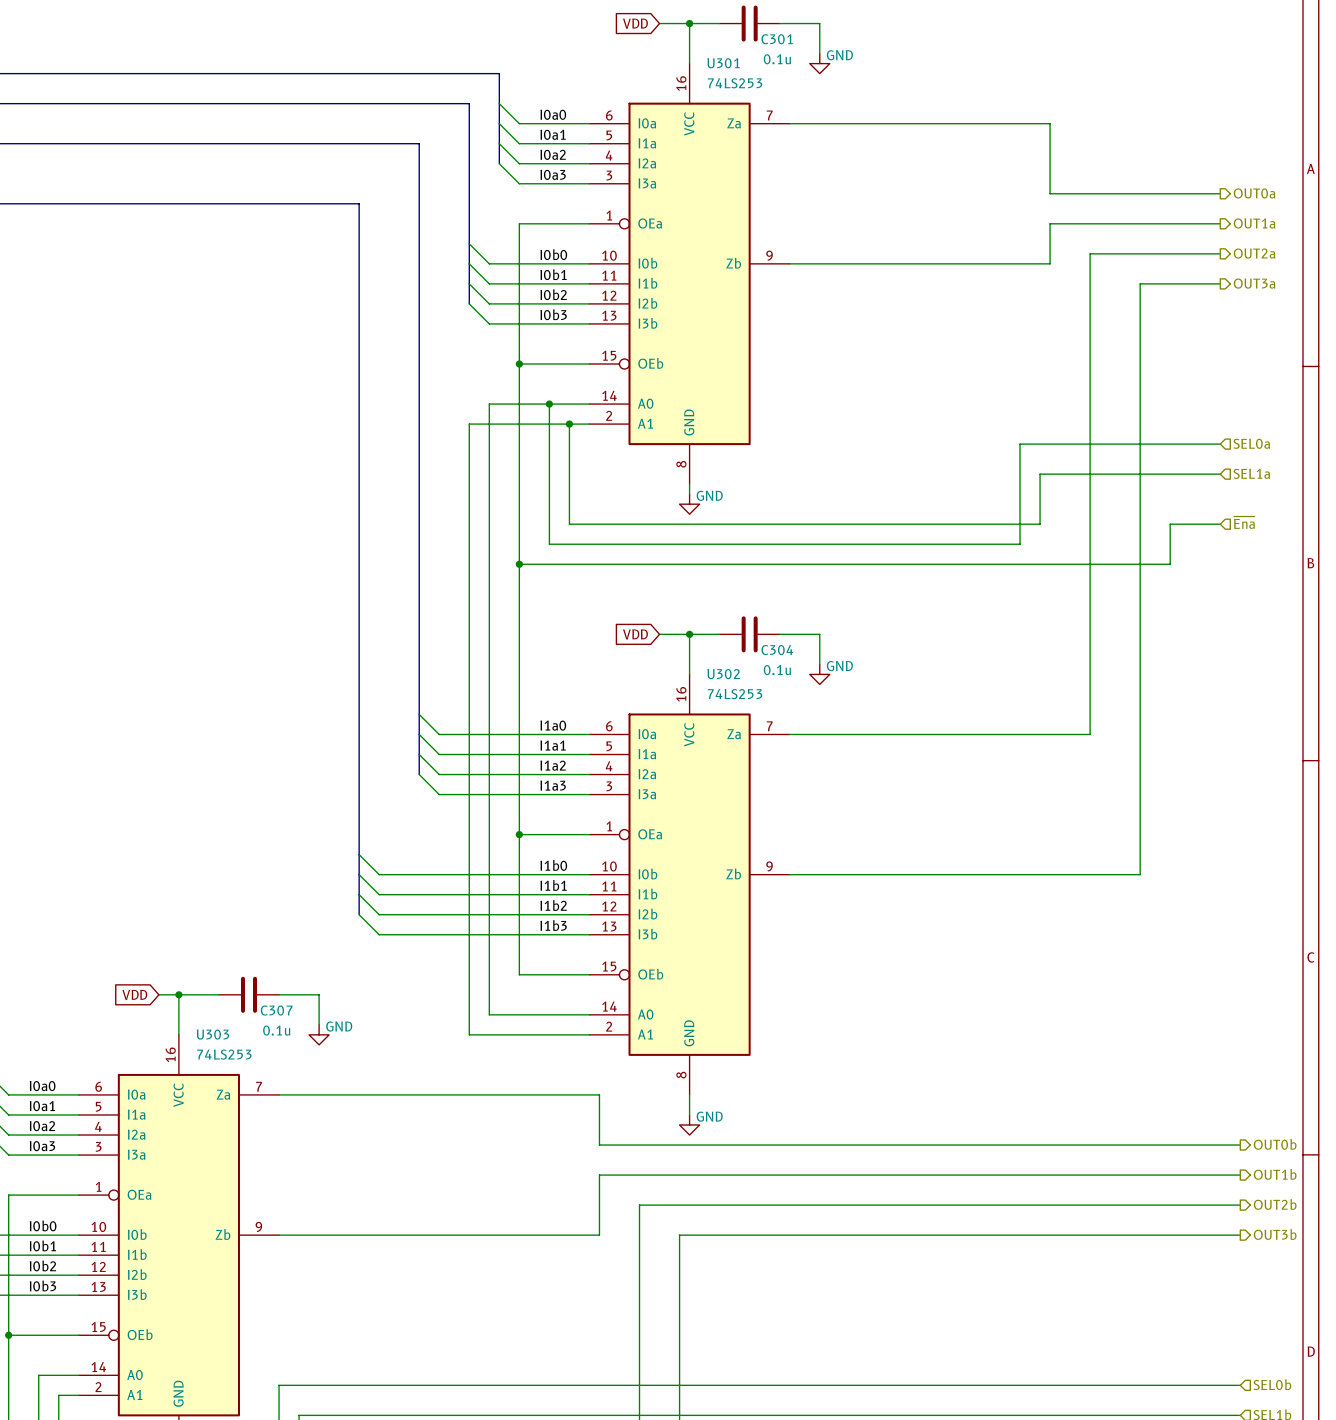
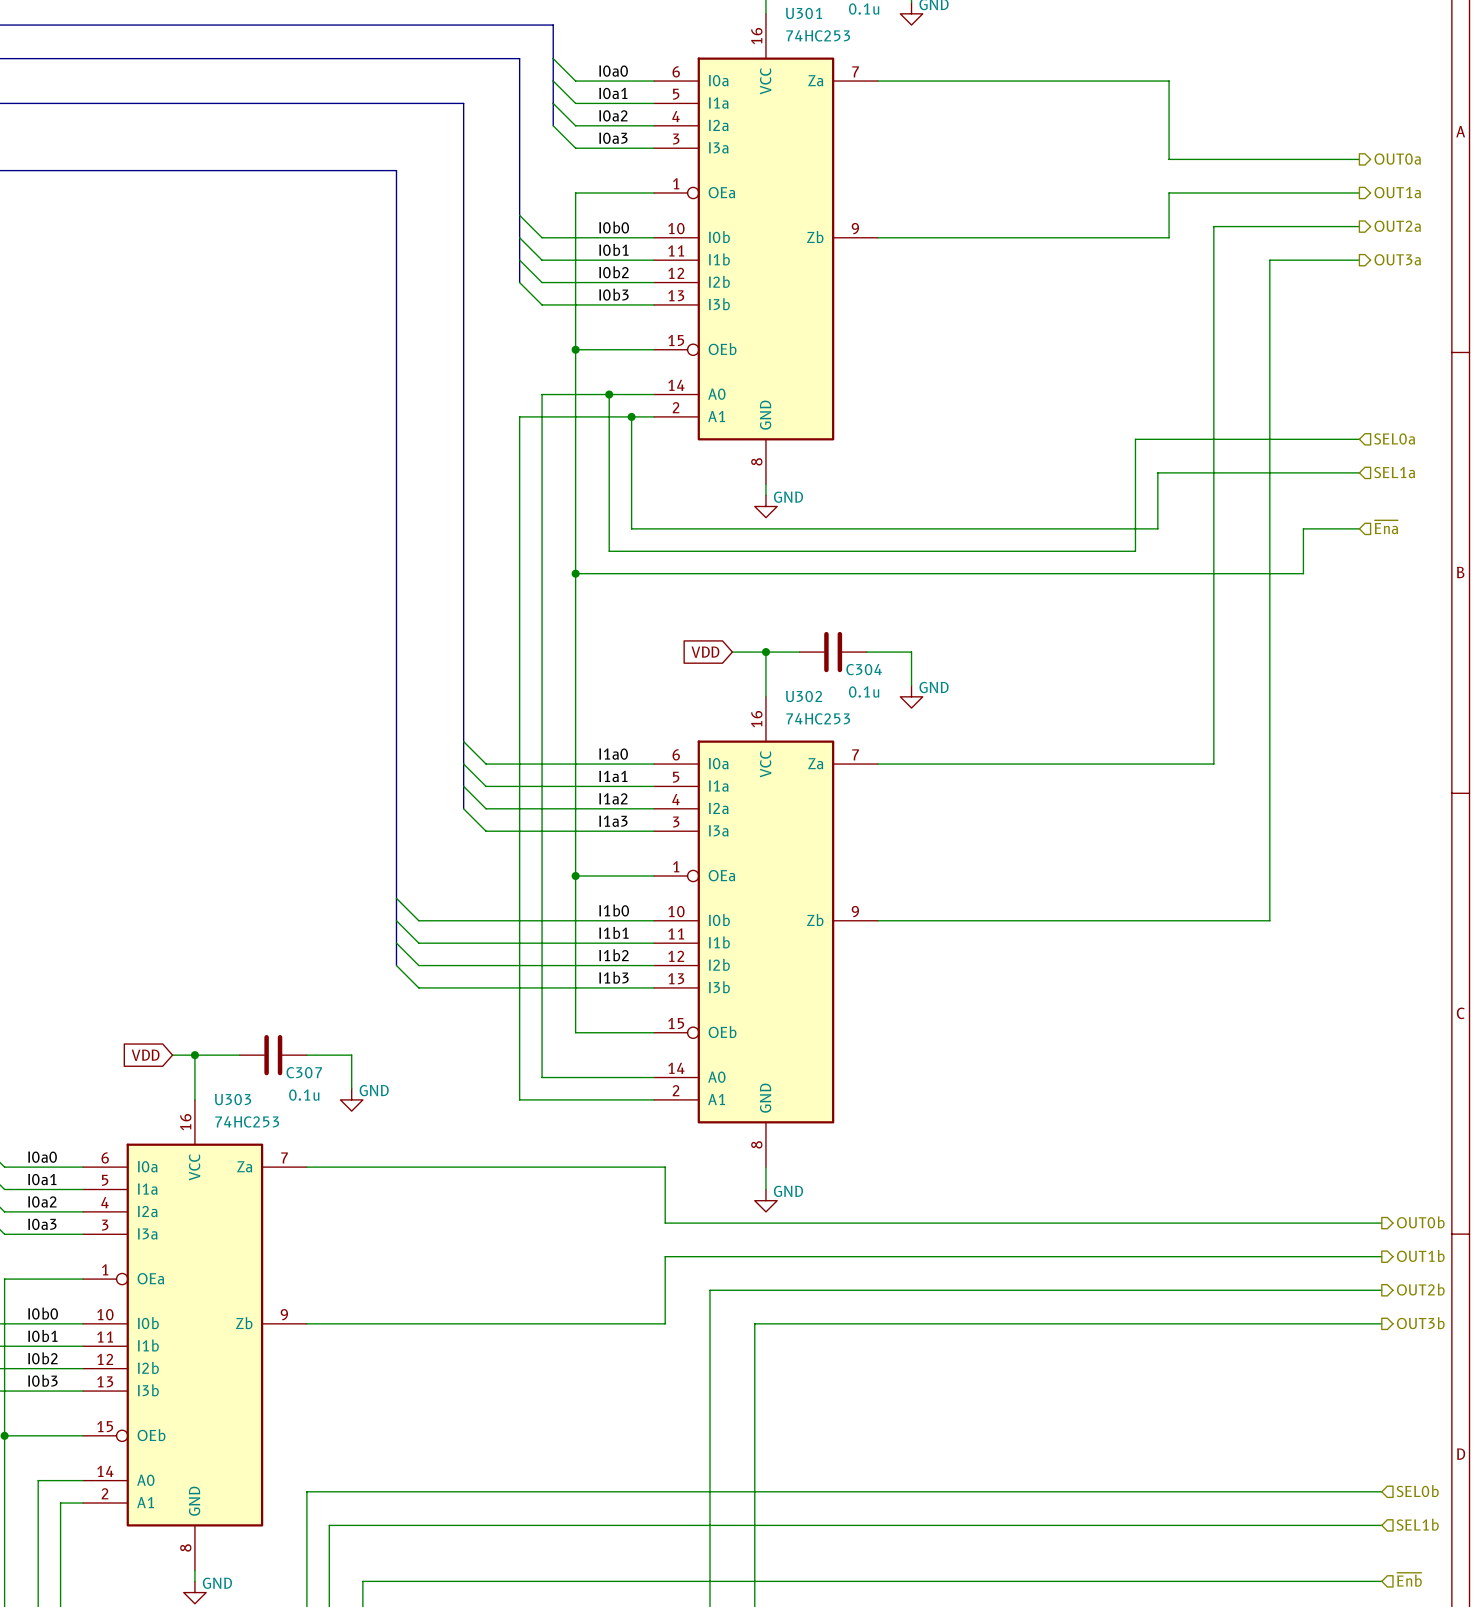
U301 value: 74LS253 (735, 83) -> 74HC253 (818, 35)
U302 value: 74LS253 (735, 694) -> 74HC253 (818, 718)
U303 value: 74LS253 (224, 1054) -> 74HC253 (247, 1121)

